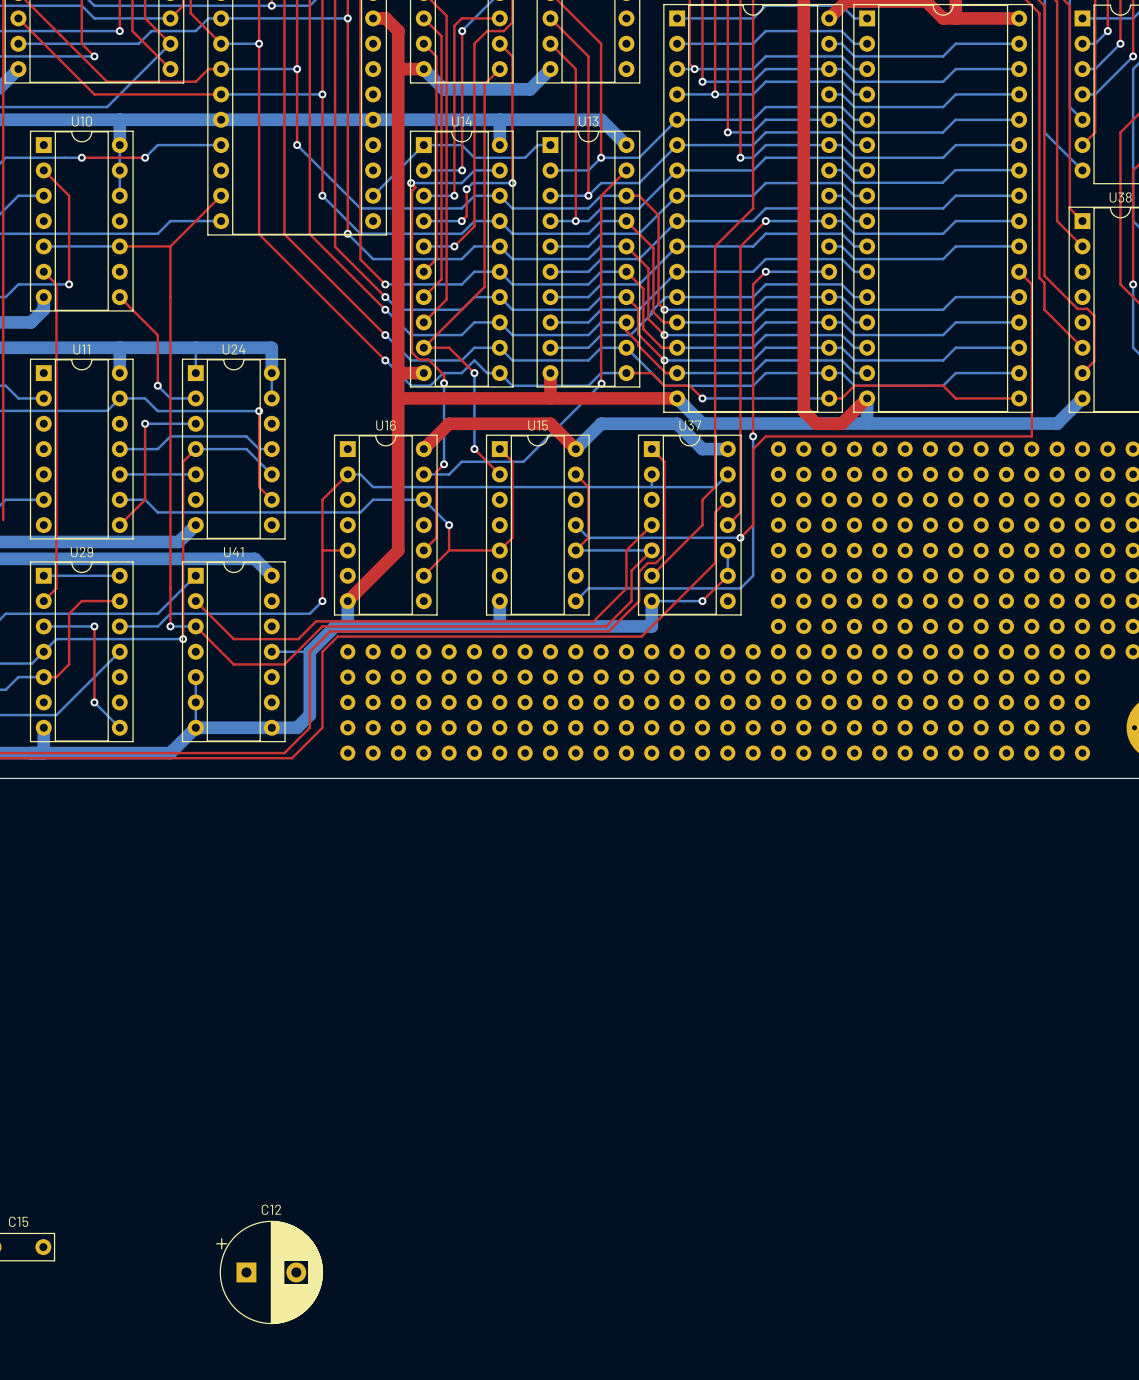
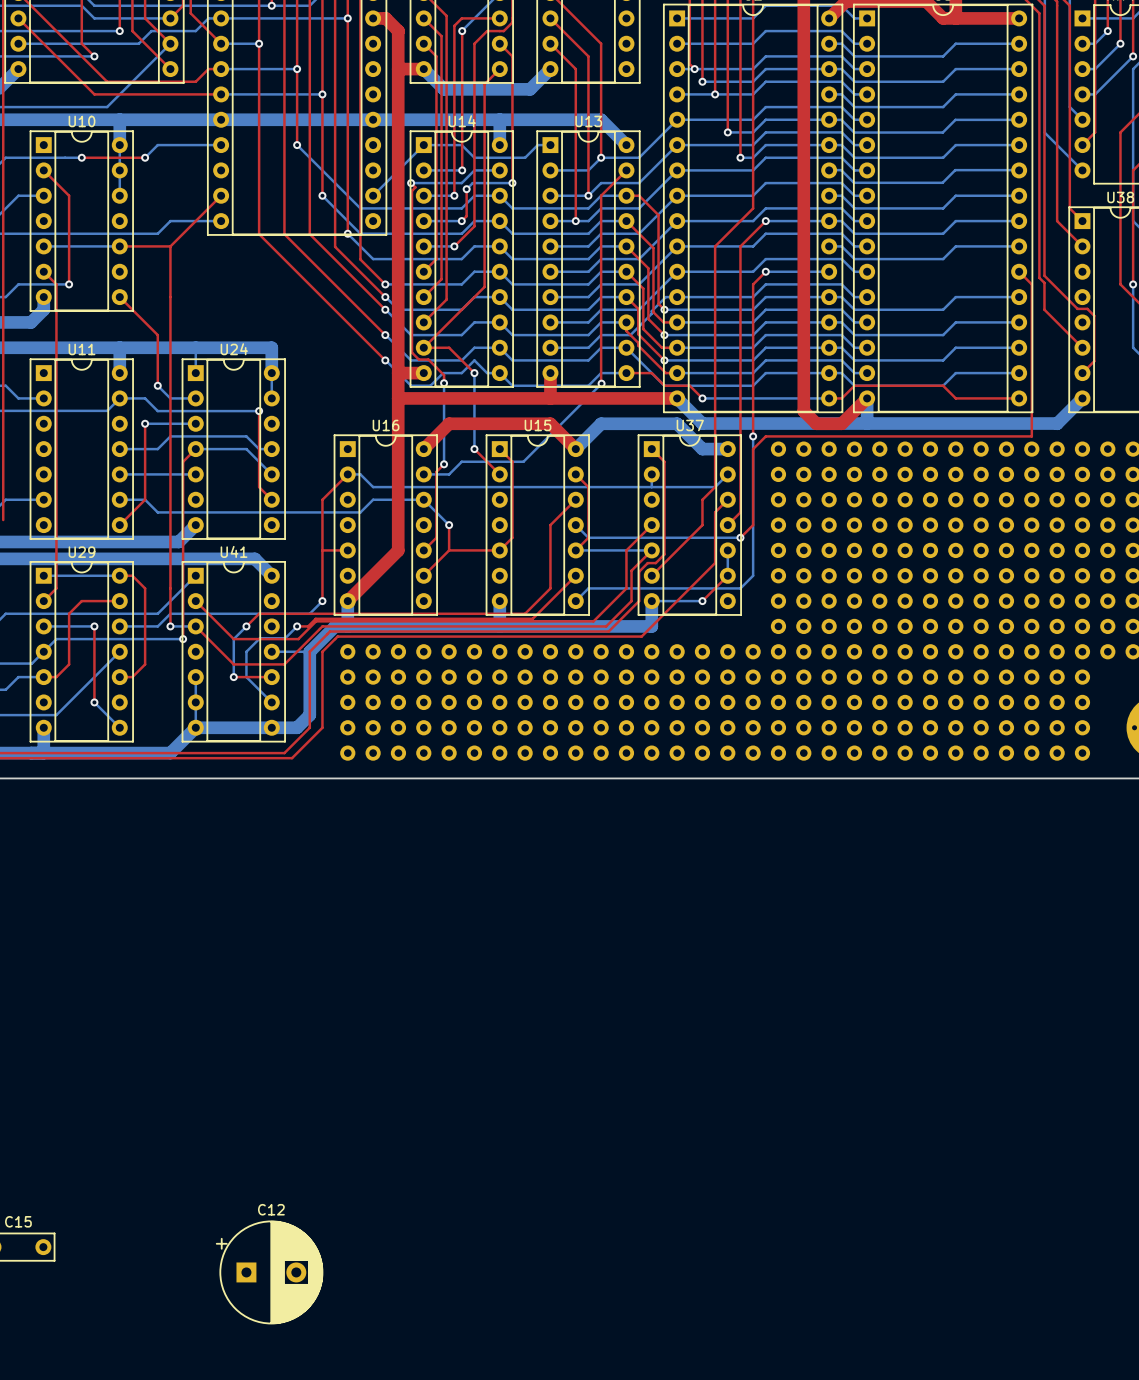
top track: none -> (575, 499) (550, 525) (550, 588) (525, 613) (259, 613) (246, 626)
top track: none -> (119, 575) (132, 575) (145, 588) (145, 664) (132, 677) (119, 677)
top track: none -> (575, 575) (532, 618) (315, 618) (308, 626) (297, 626)
bottom track: none -> (246, 626) (233, 639) (233, 677)
via: none -> (246, 626)
bottom track: none -> (297, 626) (285, 638) (259, 638) (246, 651) (246, 677) (271, 702)
via: none -> (297, 626)
top track: none -> (233, 677) (271, 677)
via: none -> (233, 677)

